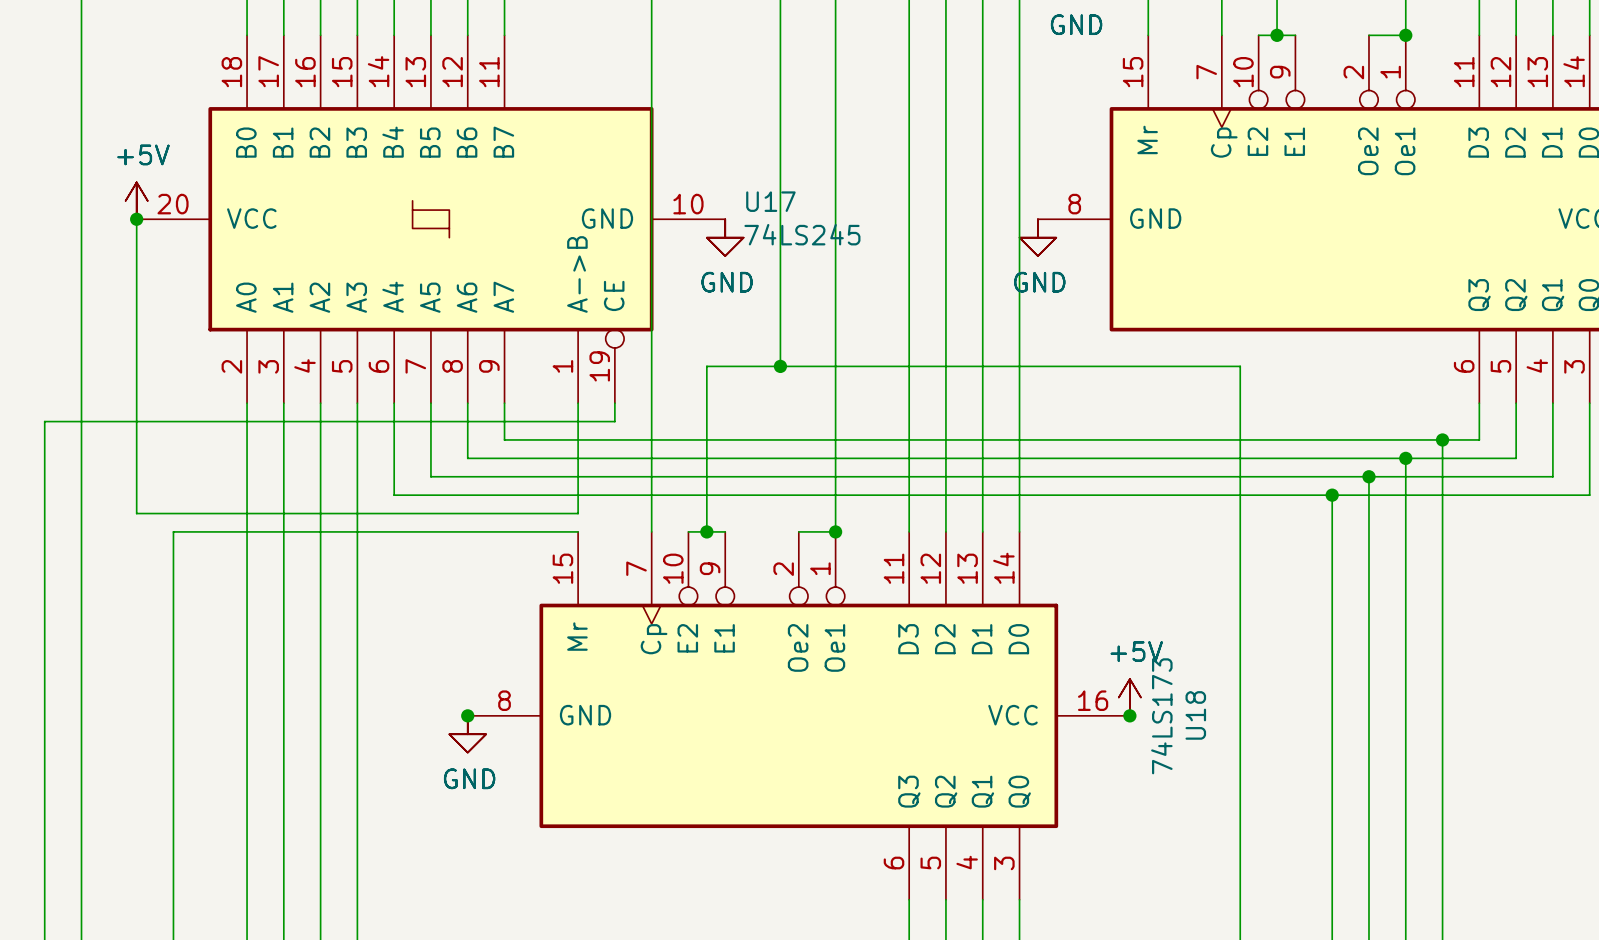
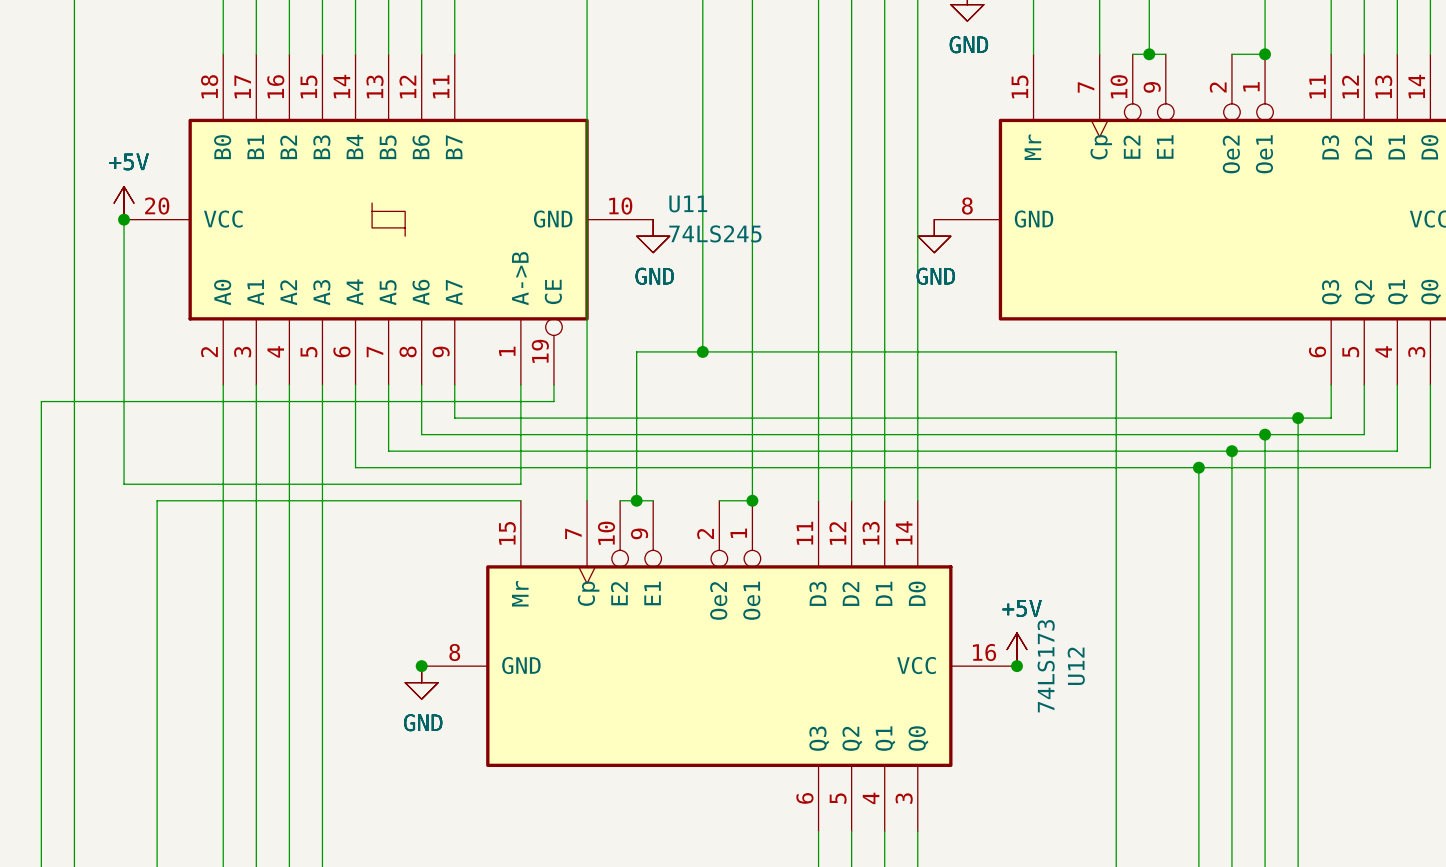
U17 name: U17 (770, 201) -> U11 (688, 203)
U18 name: U18 (1195, 715) -> U12 (1076, 666)

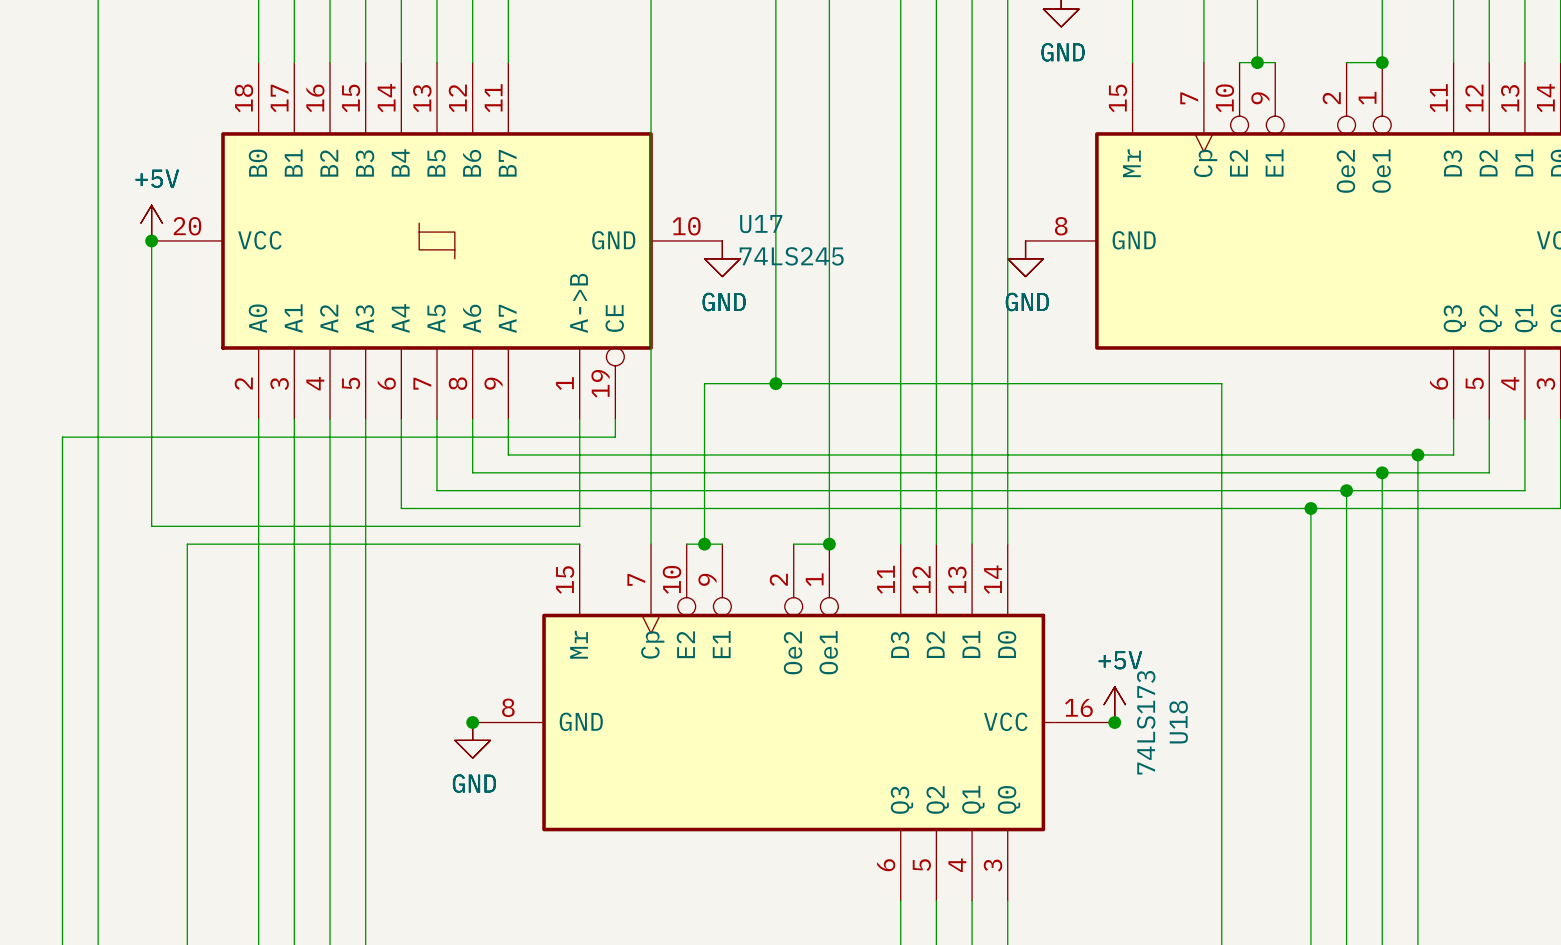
U11 name: U11 (688, 203) -> U17 (761, 224)
U12 name: U12 (1076, 666) -> U18 (1178, 722)

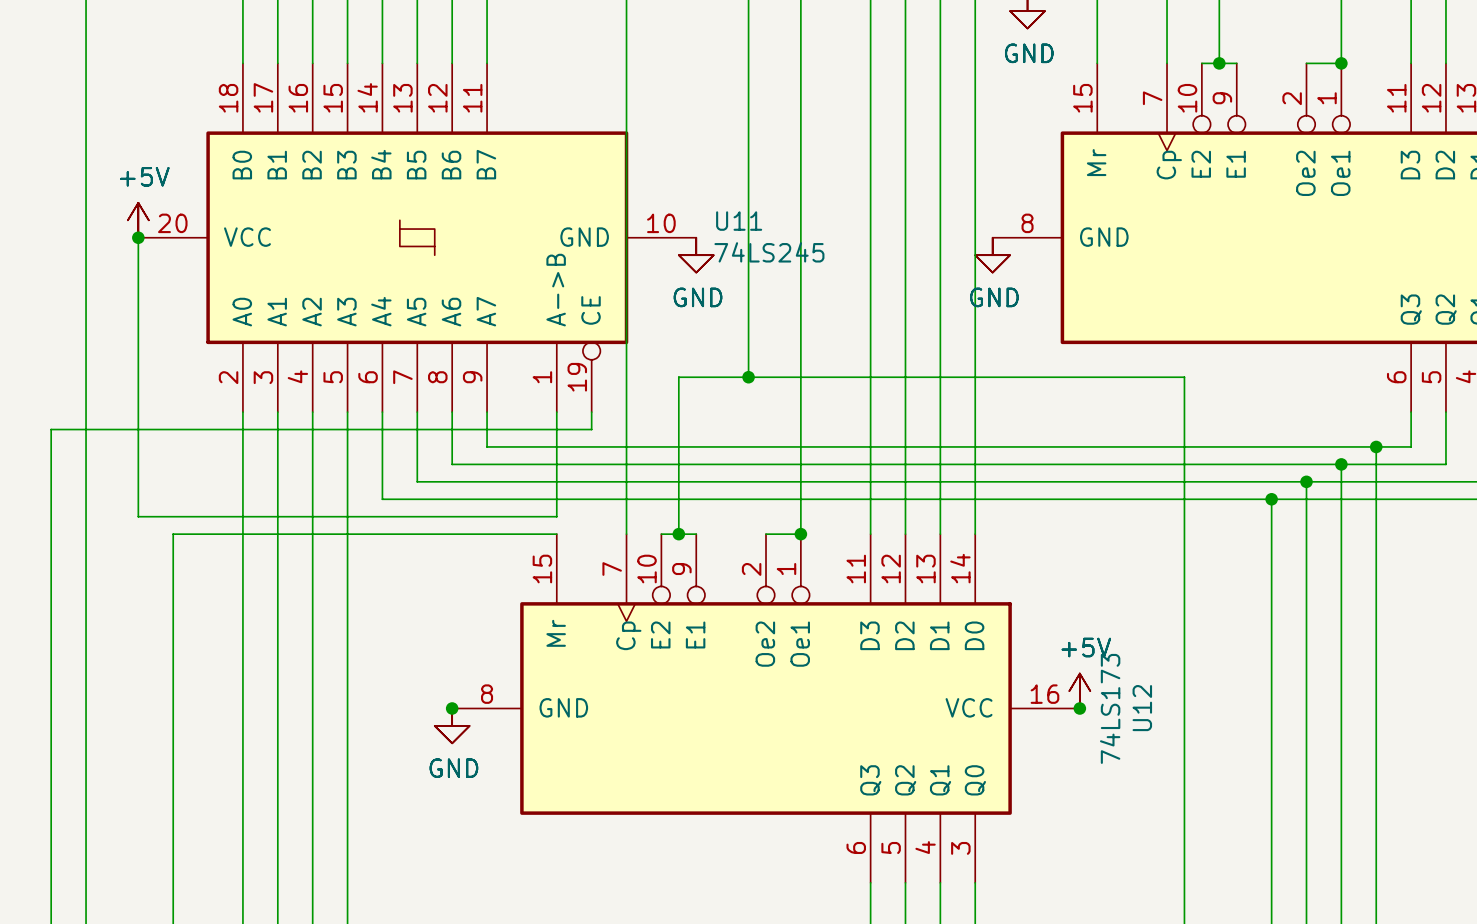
U17 name: U17 (761, 224) -> U11 (739, 221)
U18 name: U18 (1178, 722) -> U12 (1142, 708)

